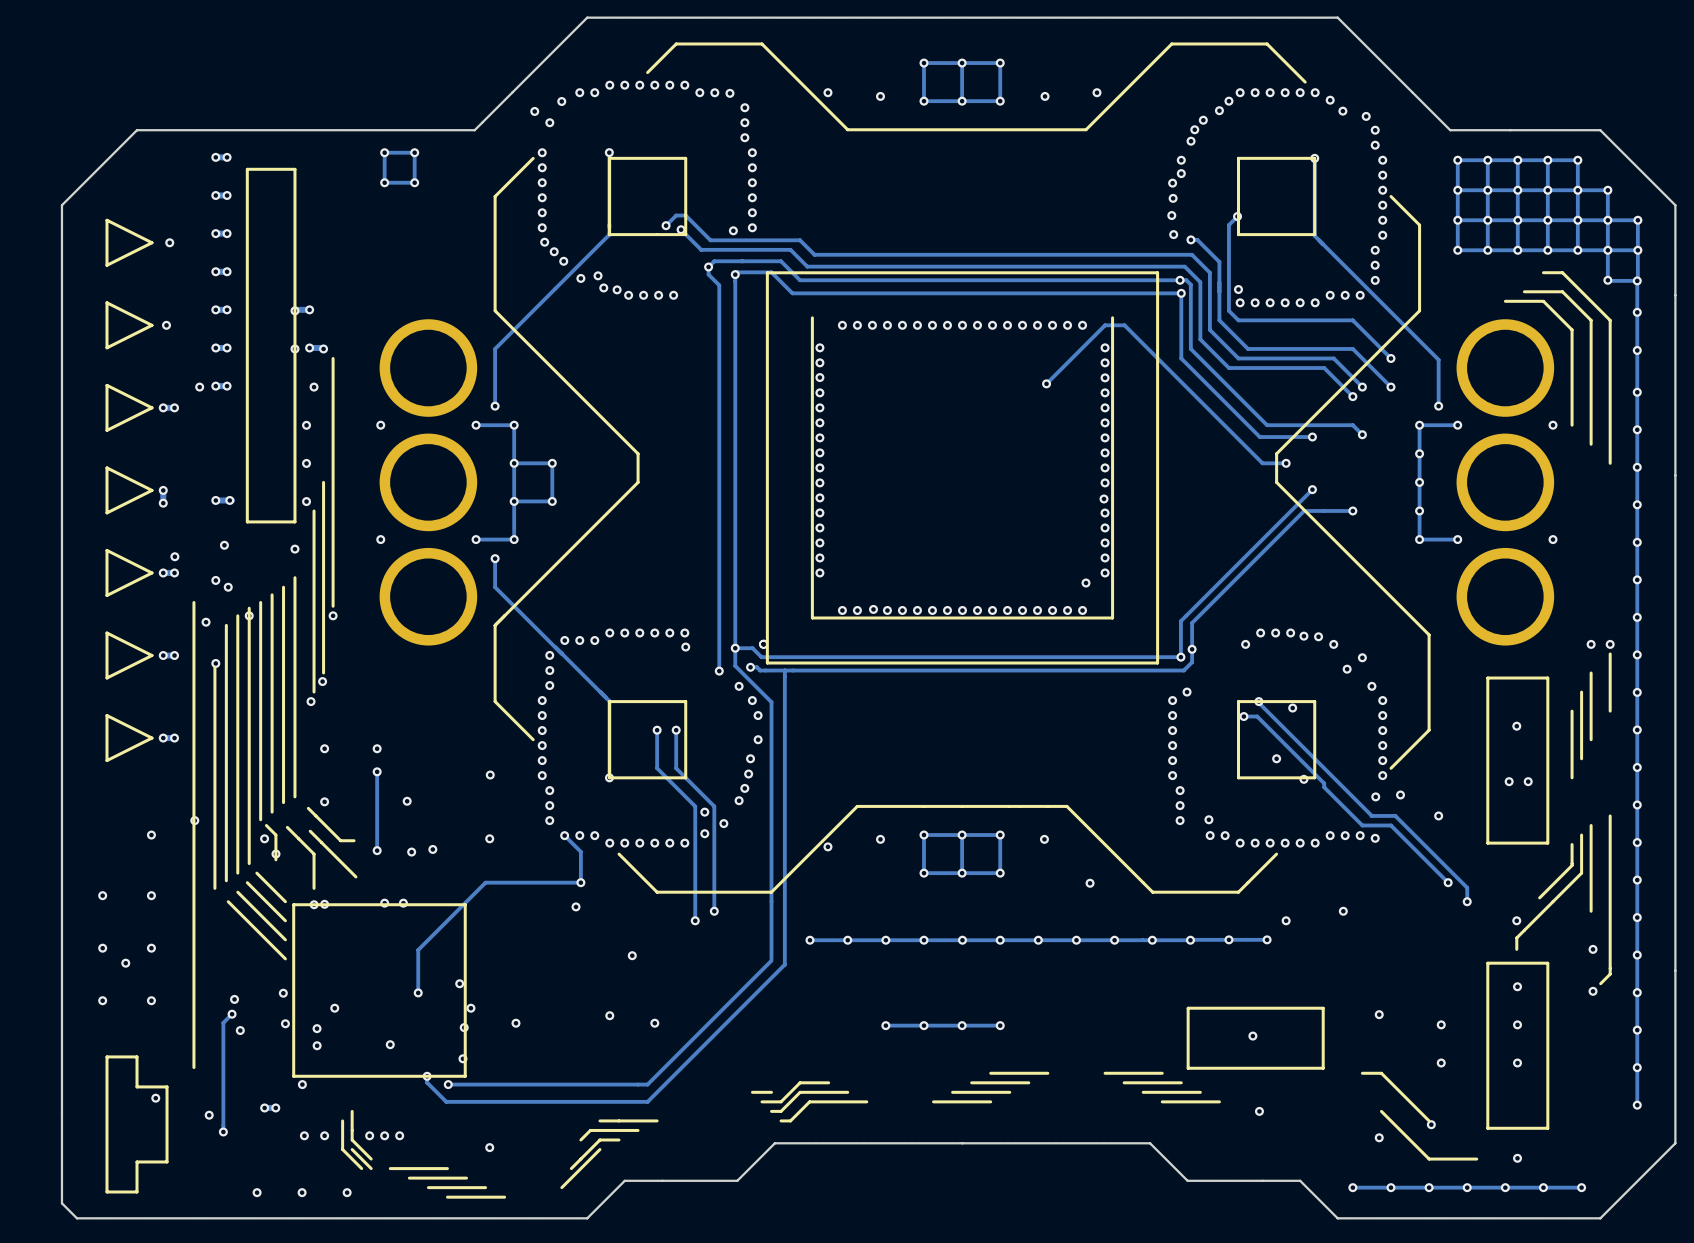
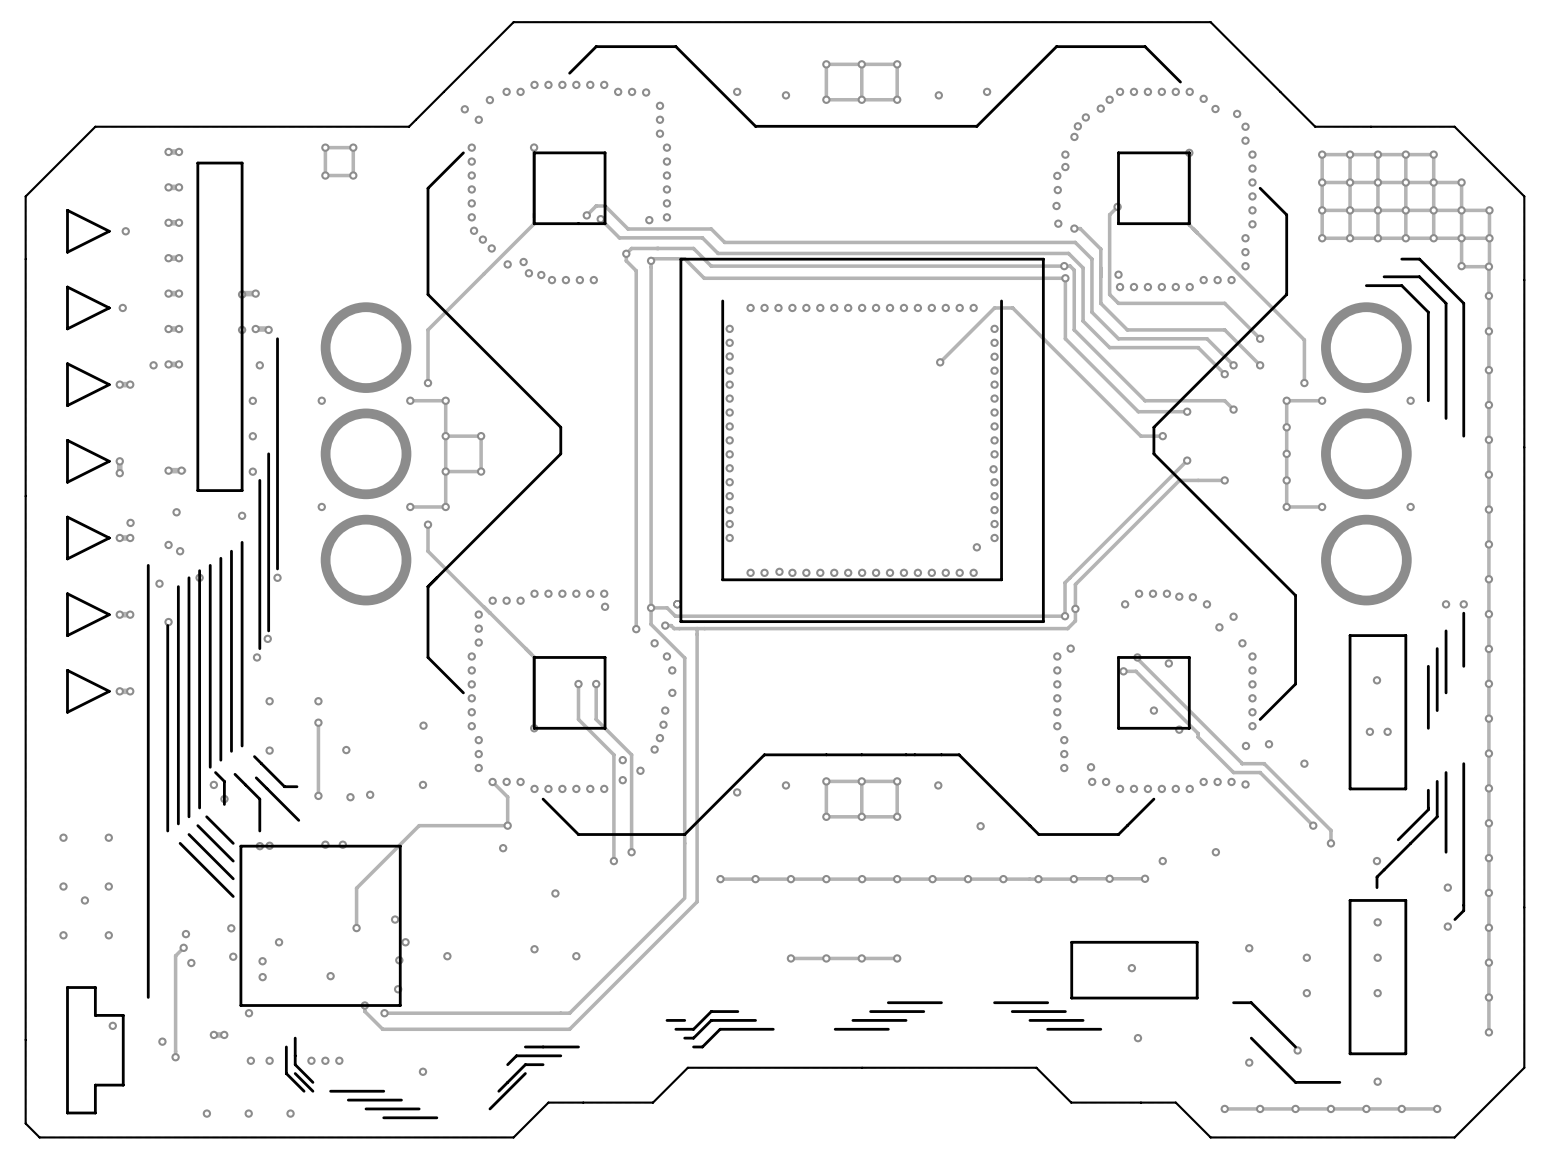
via: (194, 820) -> none
via: (151, 835) -> none

